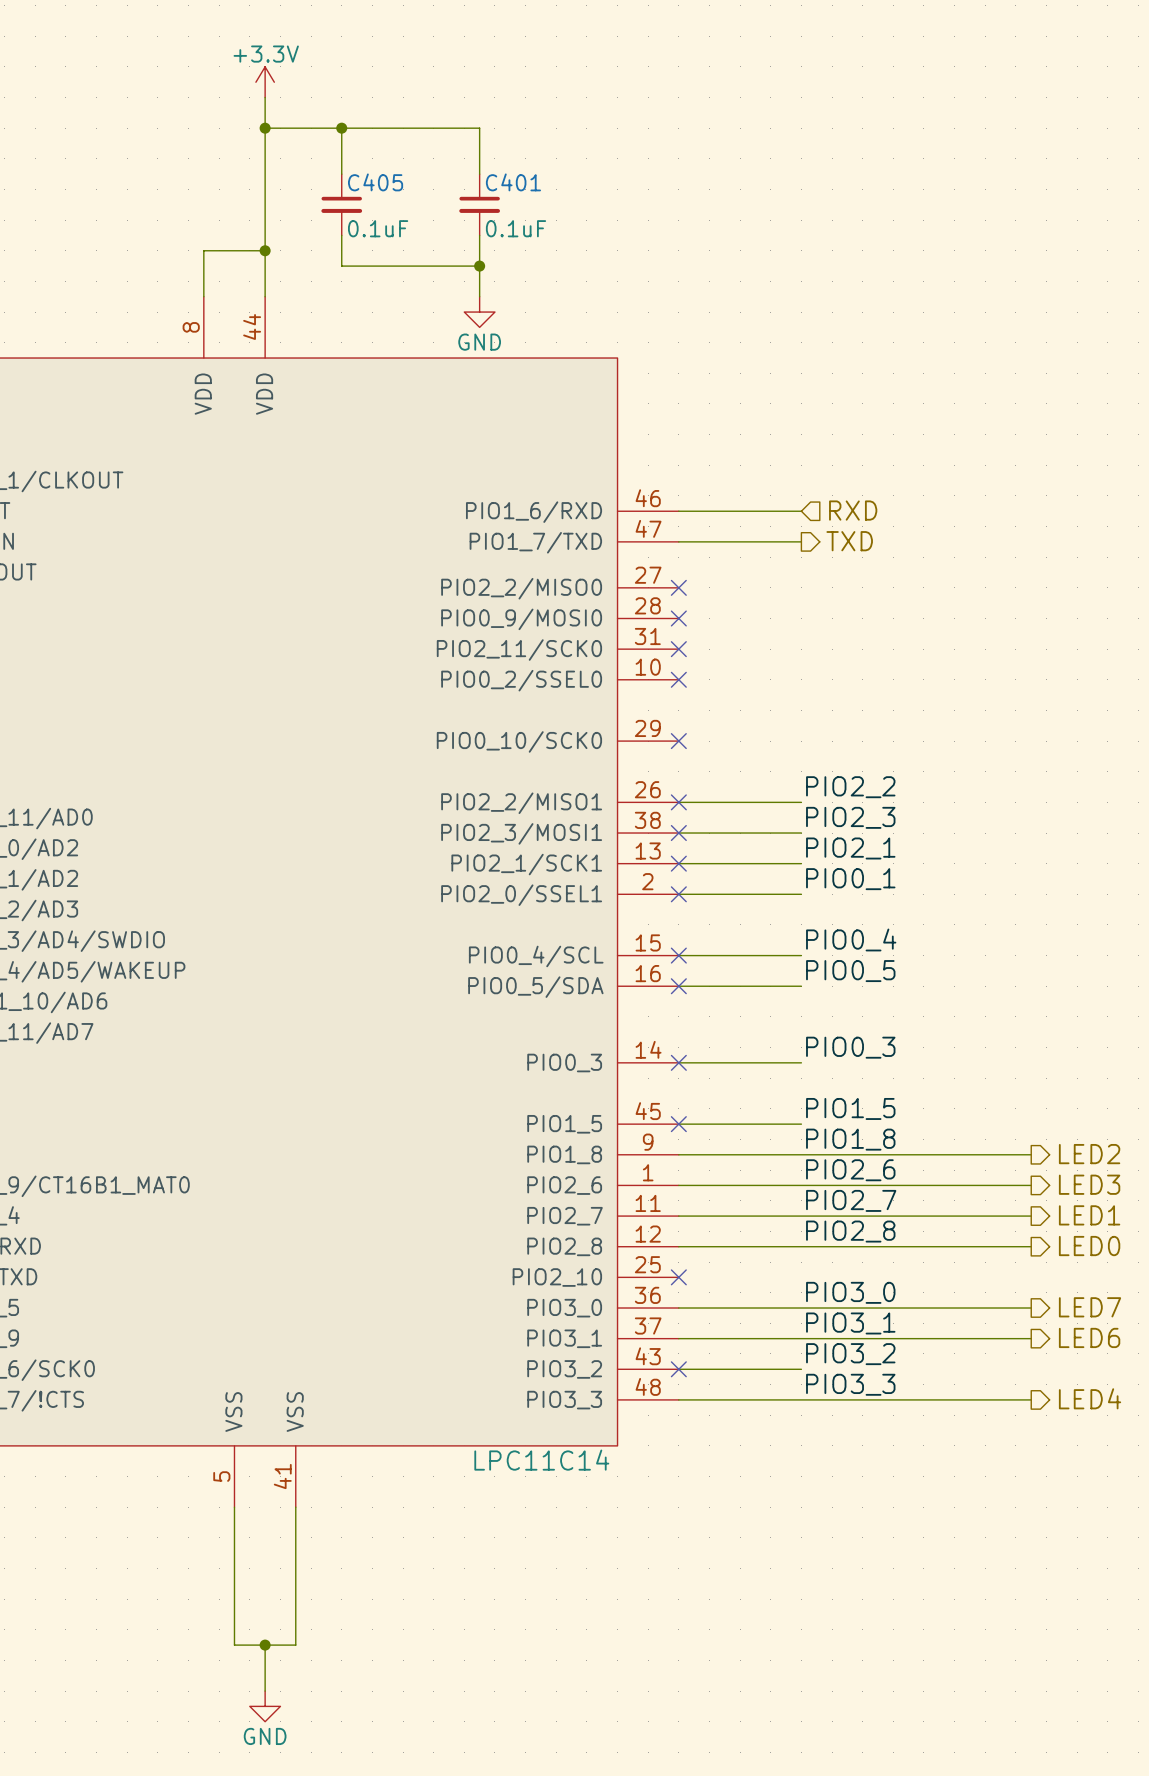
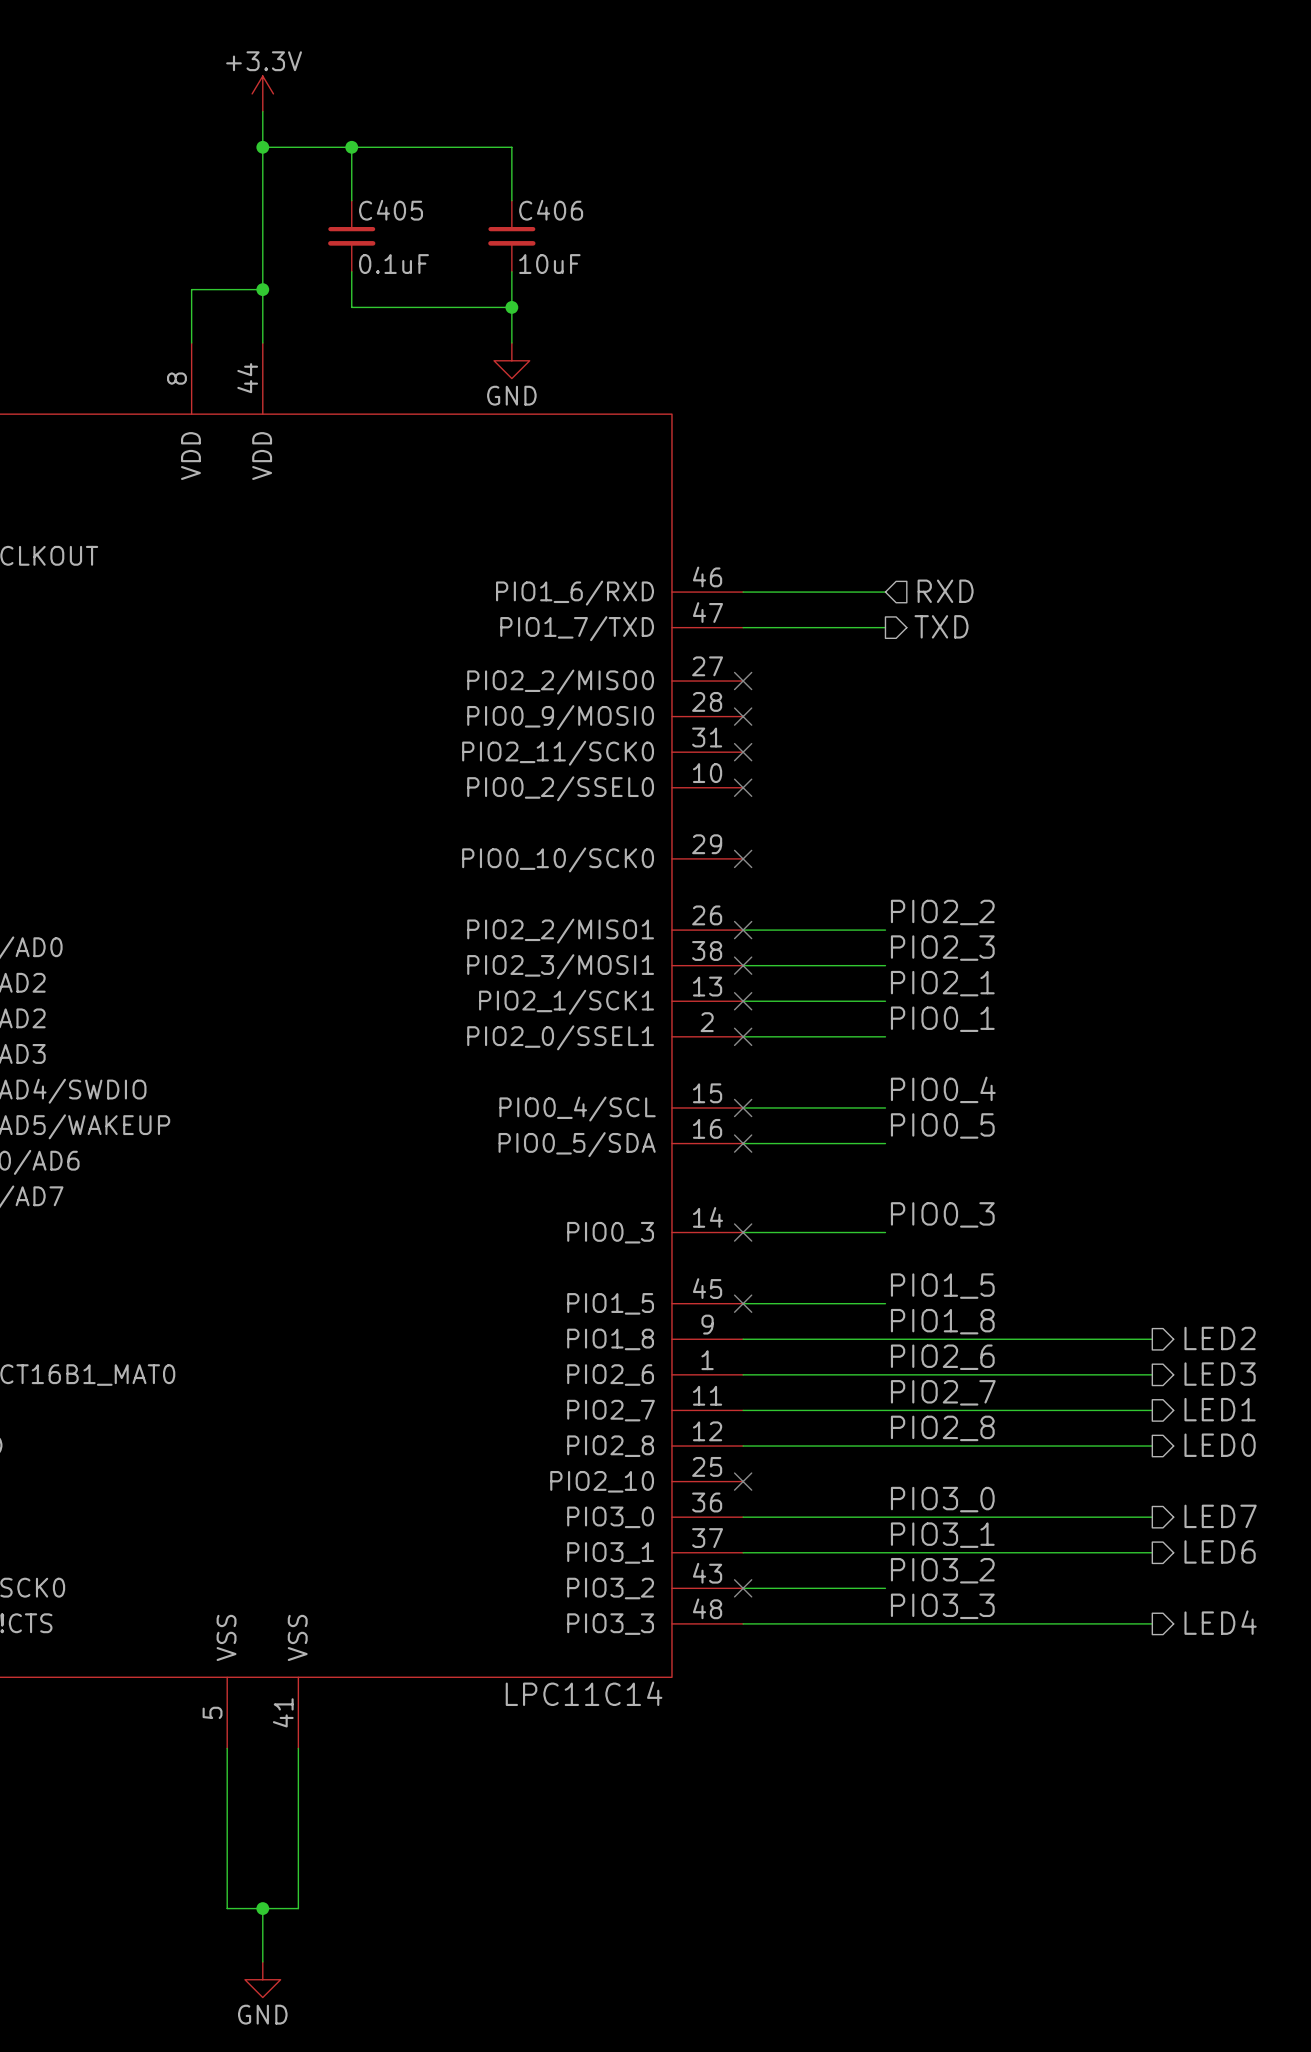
C401 name: C401 (513, 182) -> C406 (551, 210)
C401 value: 0.1uF (516, 228) -> 10uF (549, 264)

